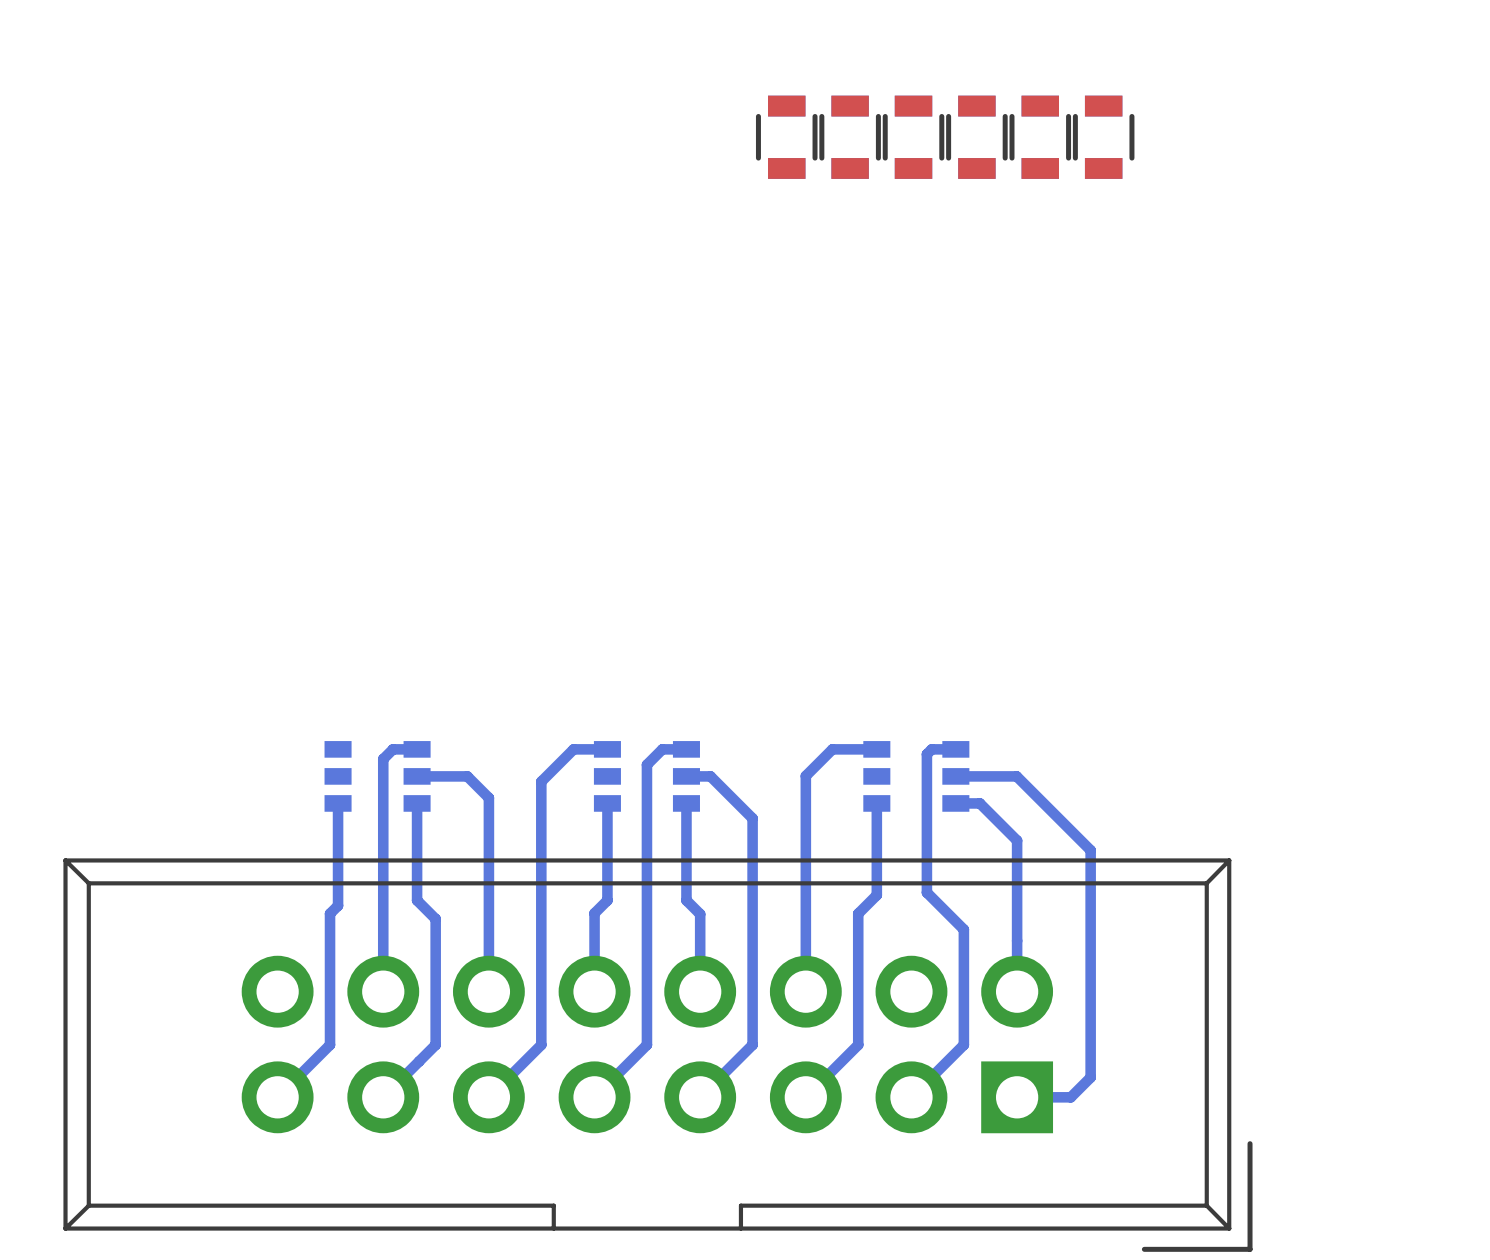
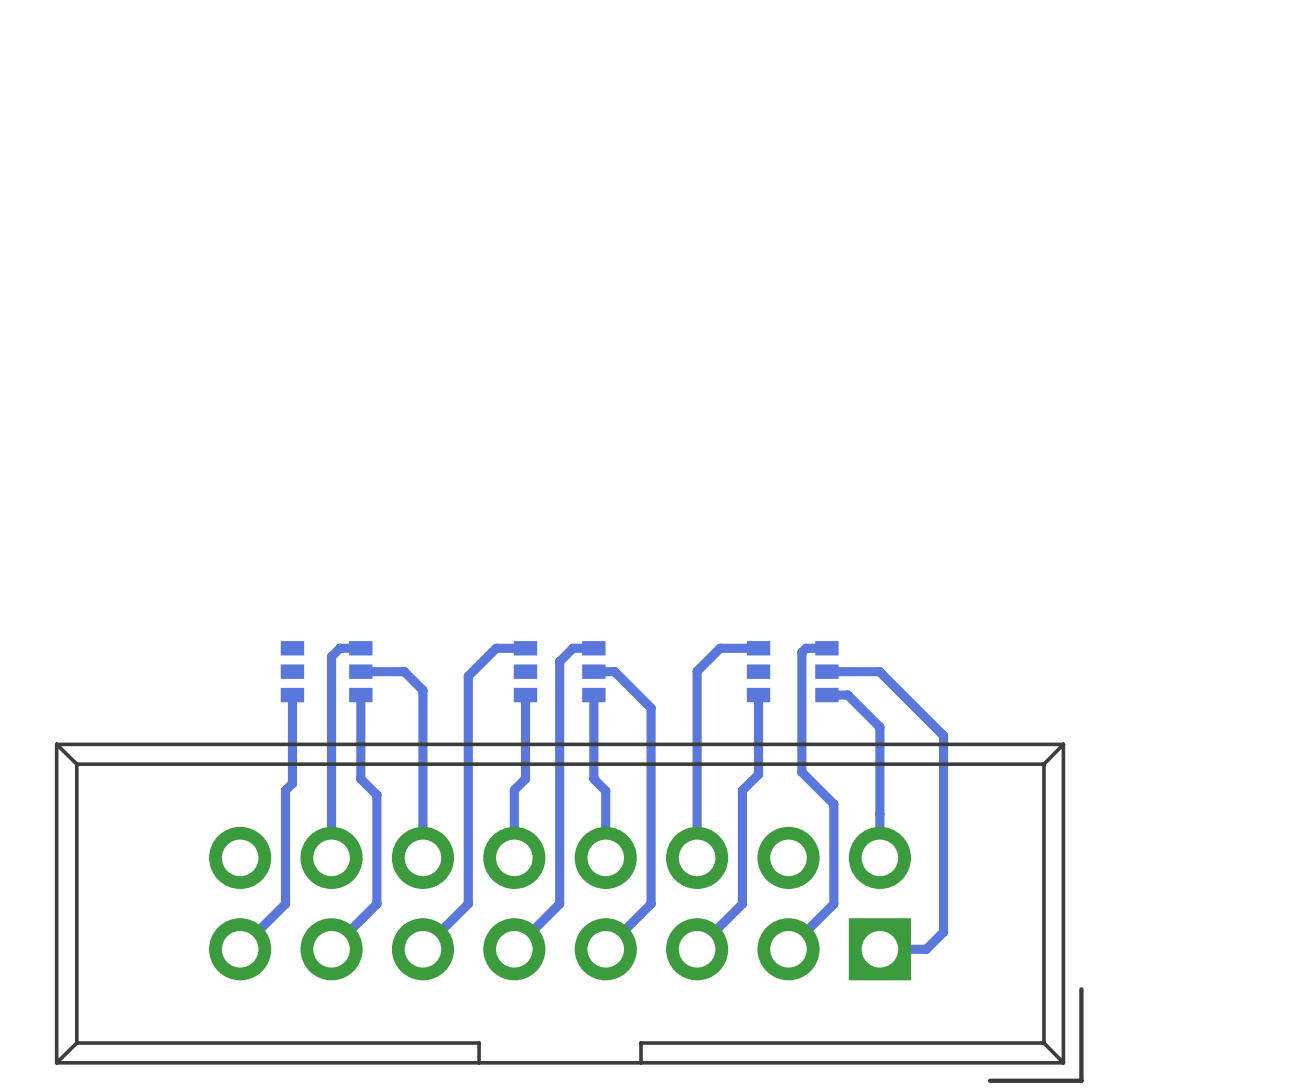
part: (786, 137) -> none
part: (850, 137) -> none
part: (913, 137) -> none
part: (976, 137) -> none
part: (1040, 137) -> none
part: (1103, 137) -> none

